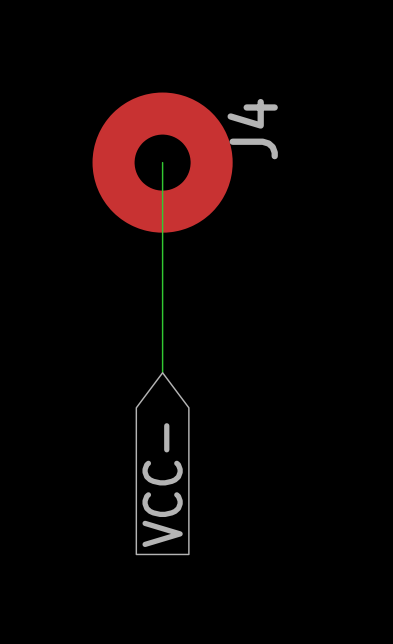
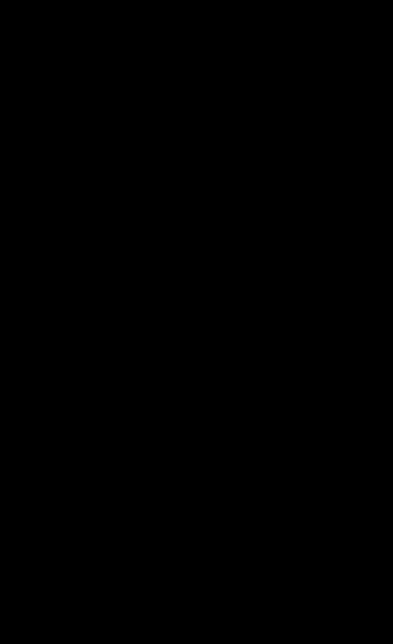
wire: (162, 162) (162, 372) -> none
J4: (162, 162) -> none
global label: VCC- (162, 485) -> none

